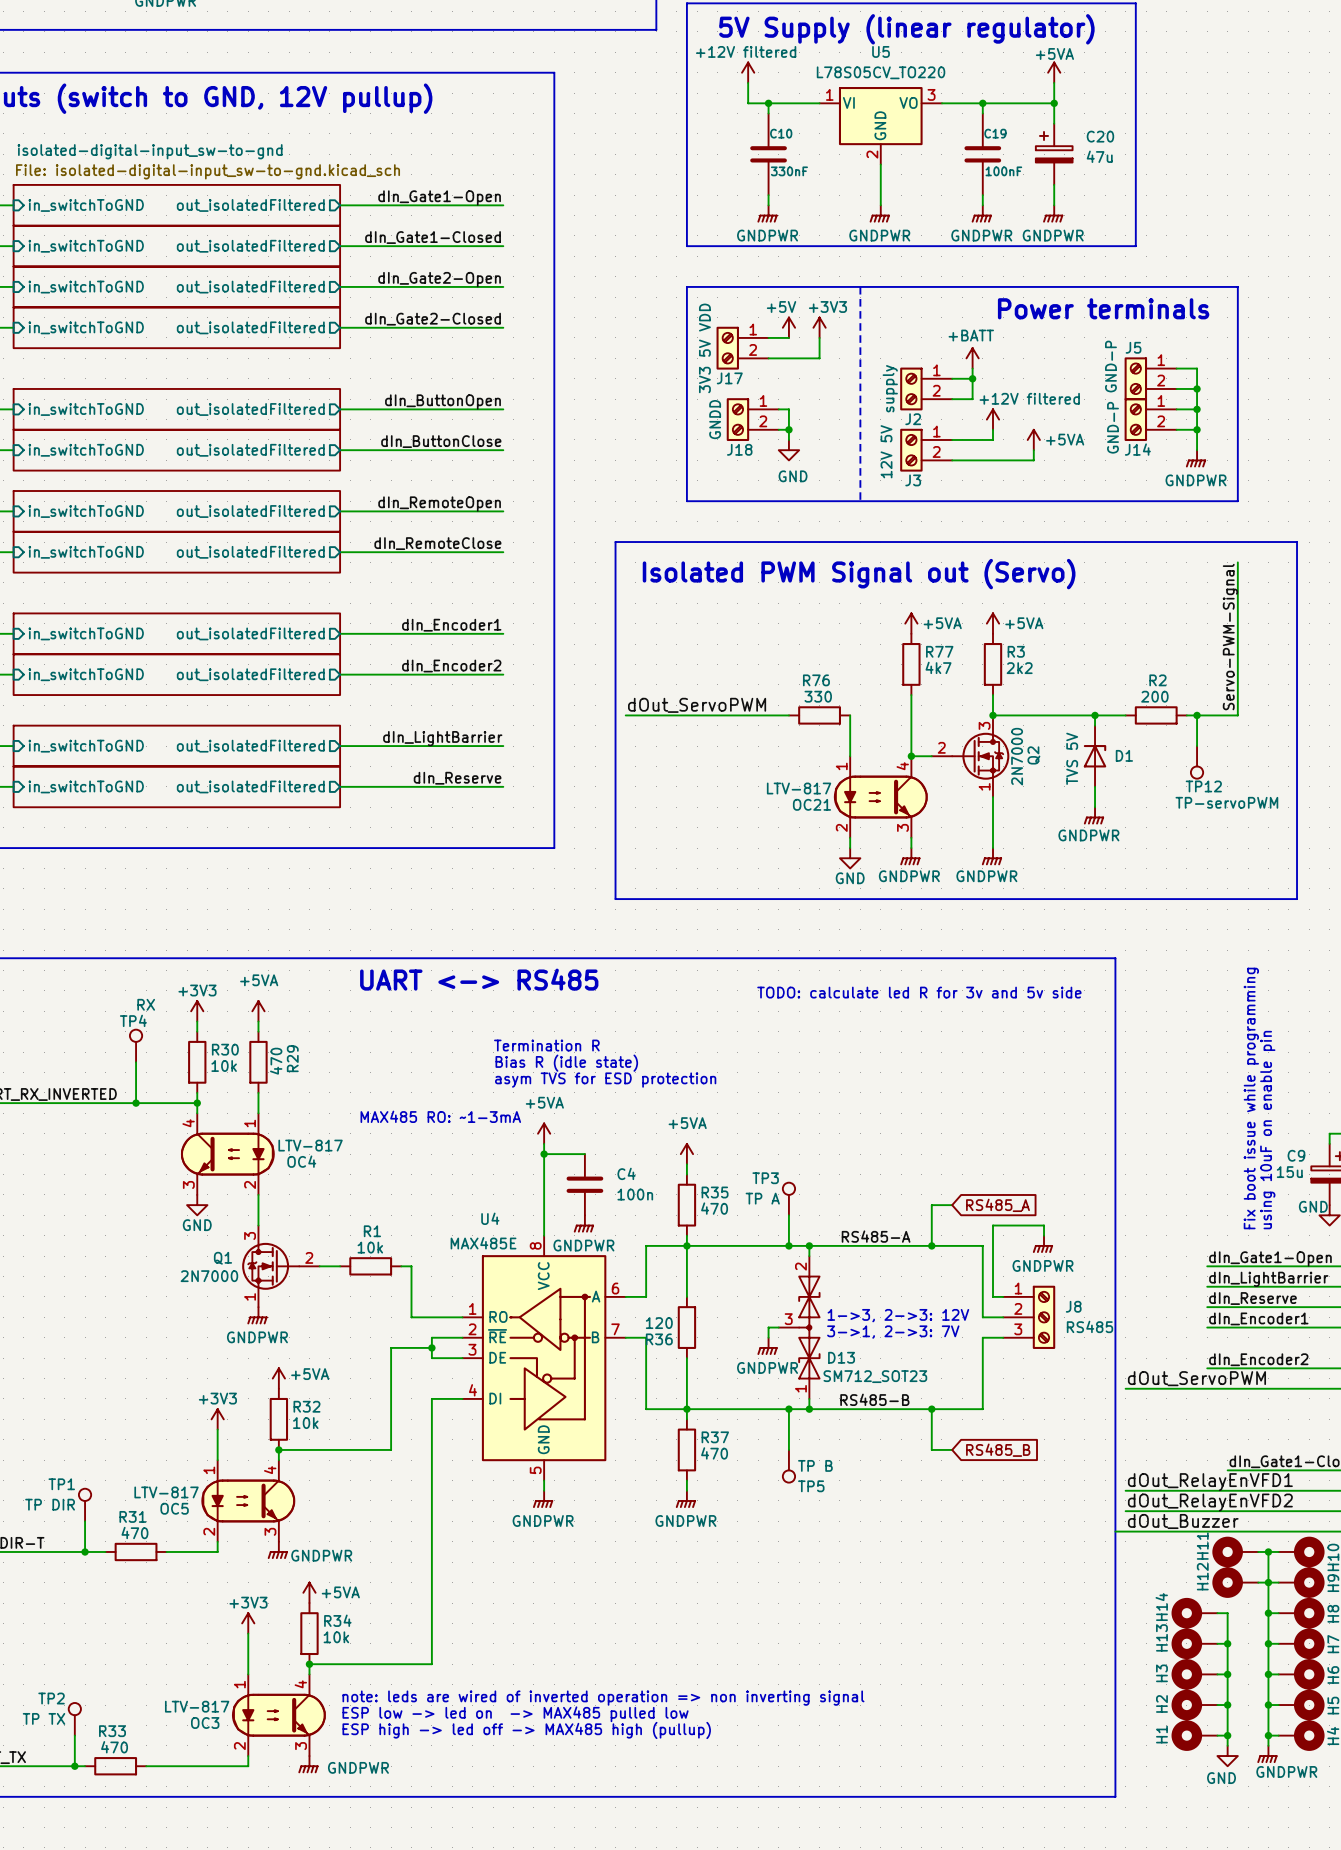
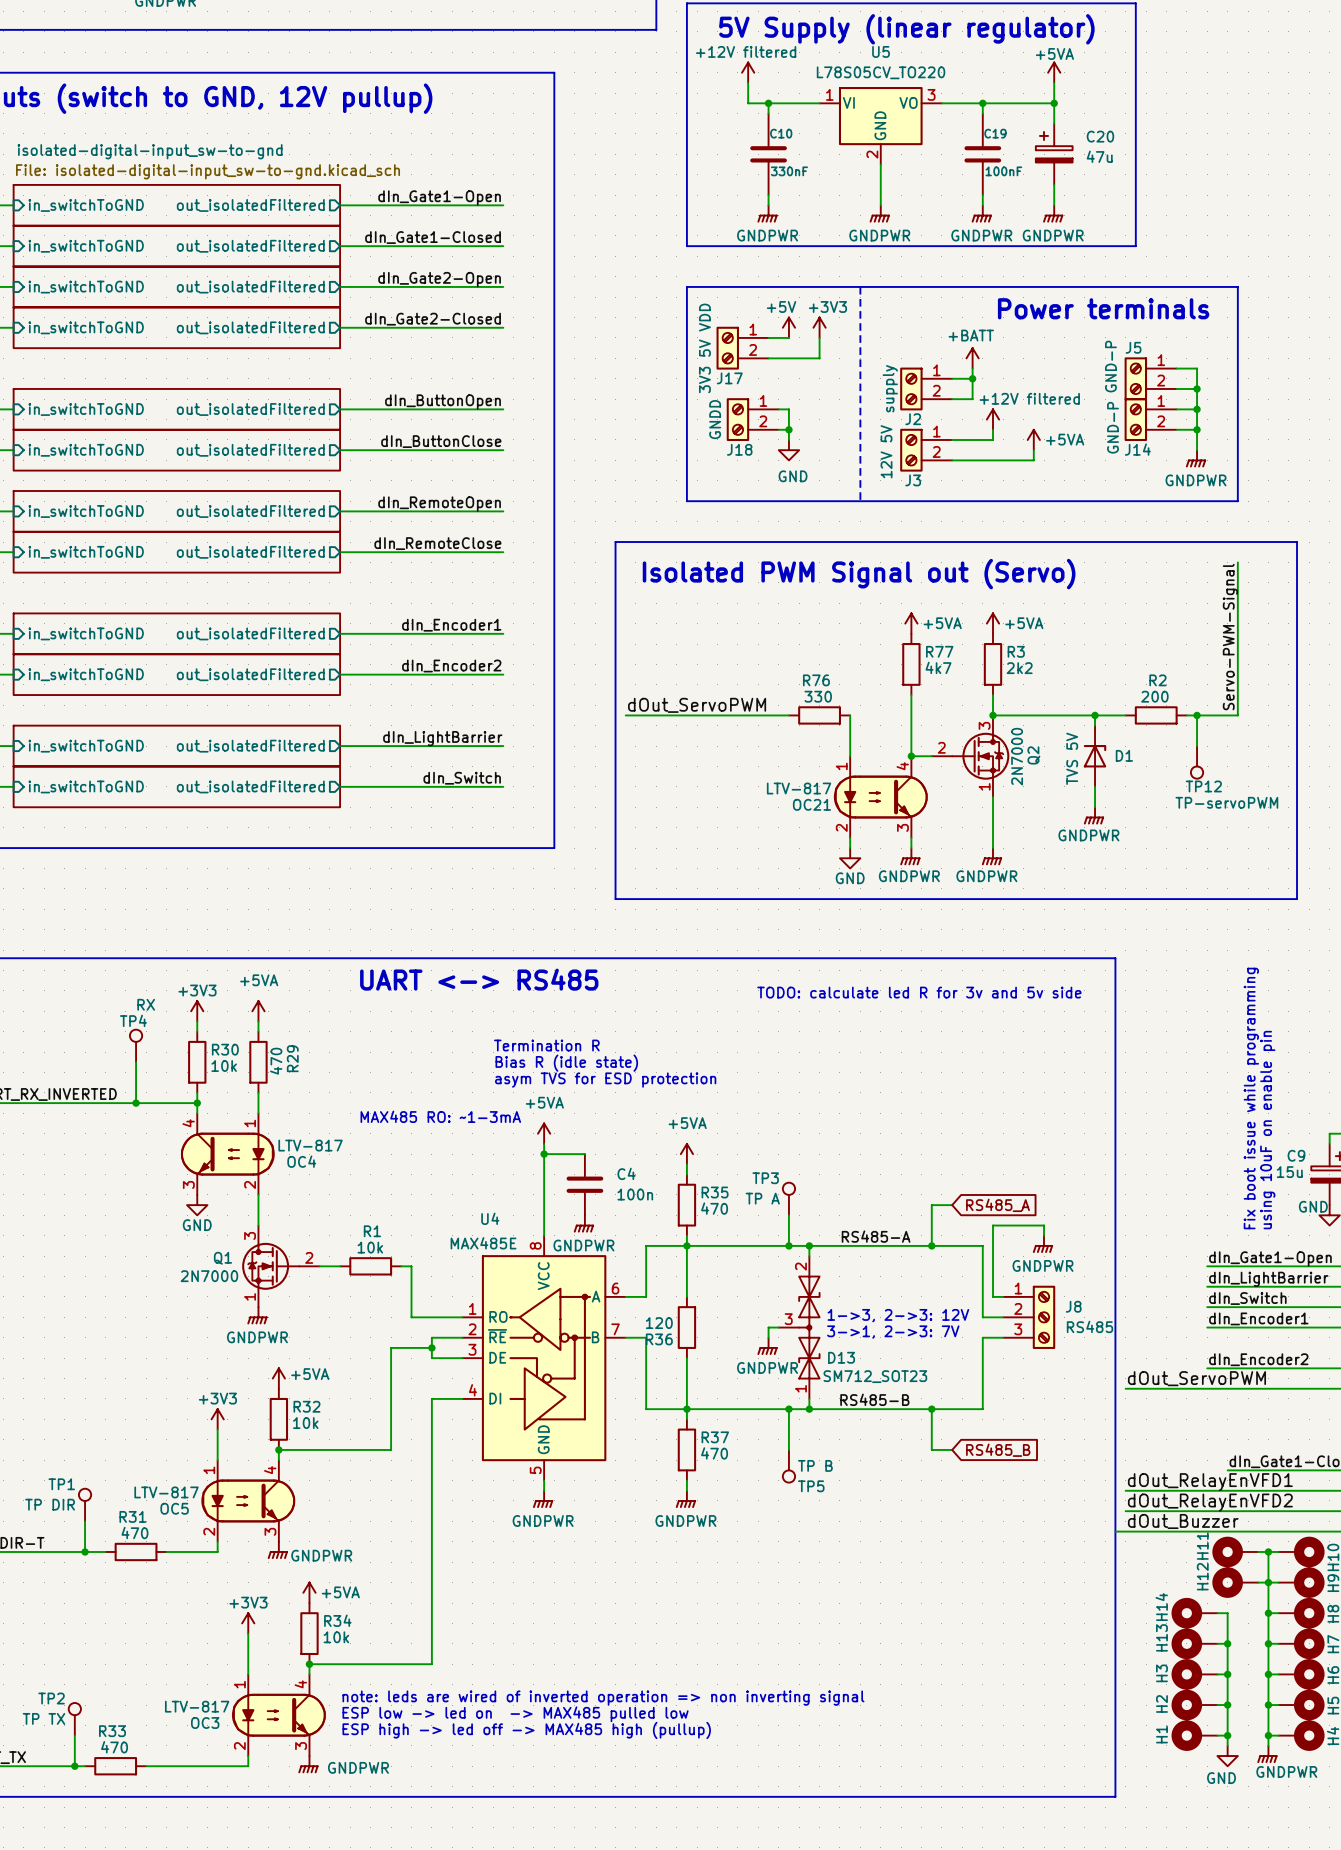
label: dIn_Reserve (457, 778) -> dIn_Switch (462, 778)
label: dIn_Reserve (1252, 1298) -> dIn_Switch (1247, 1298)

